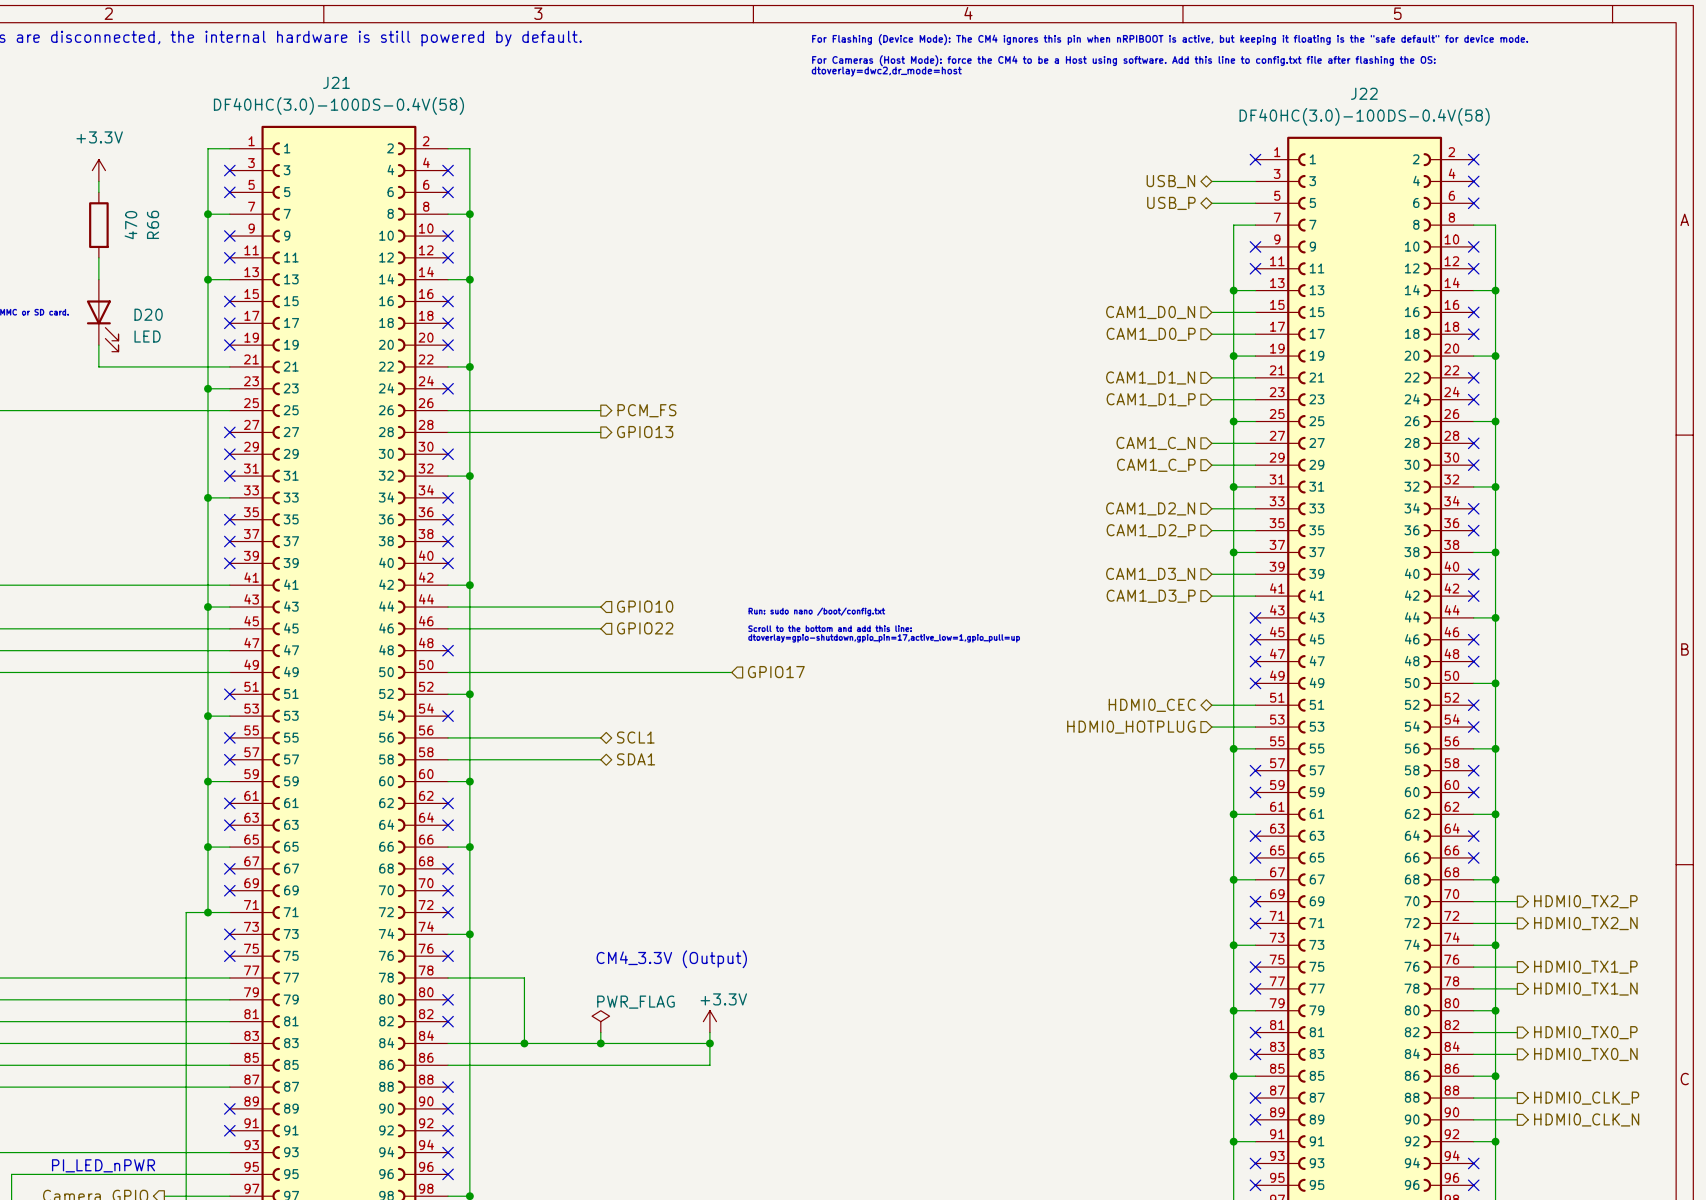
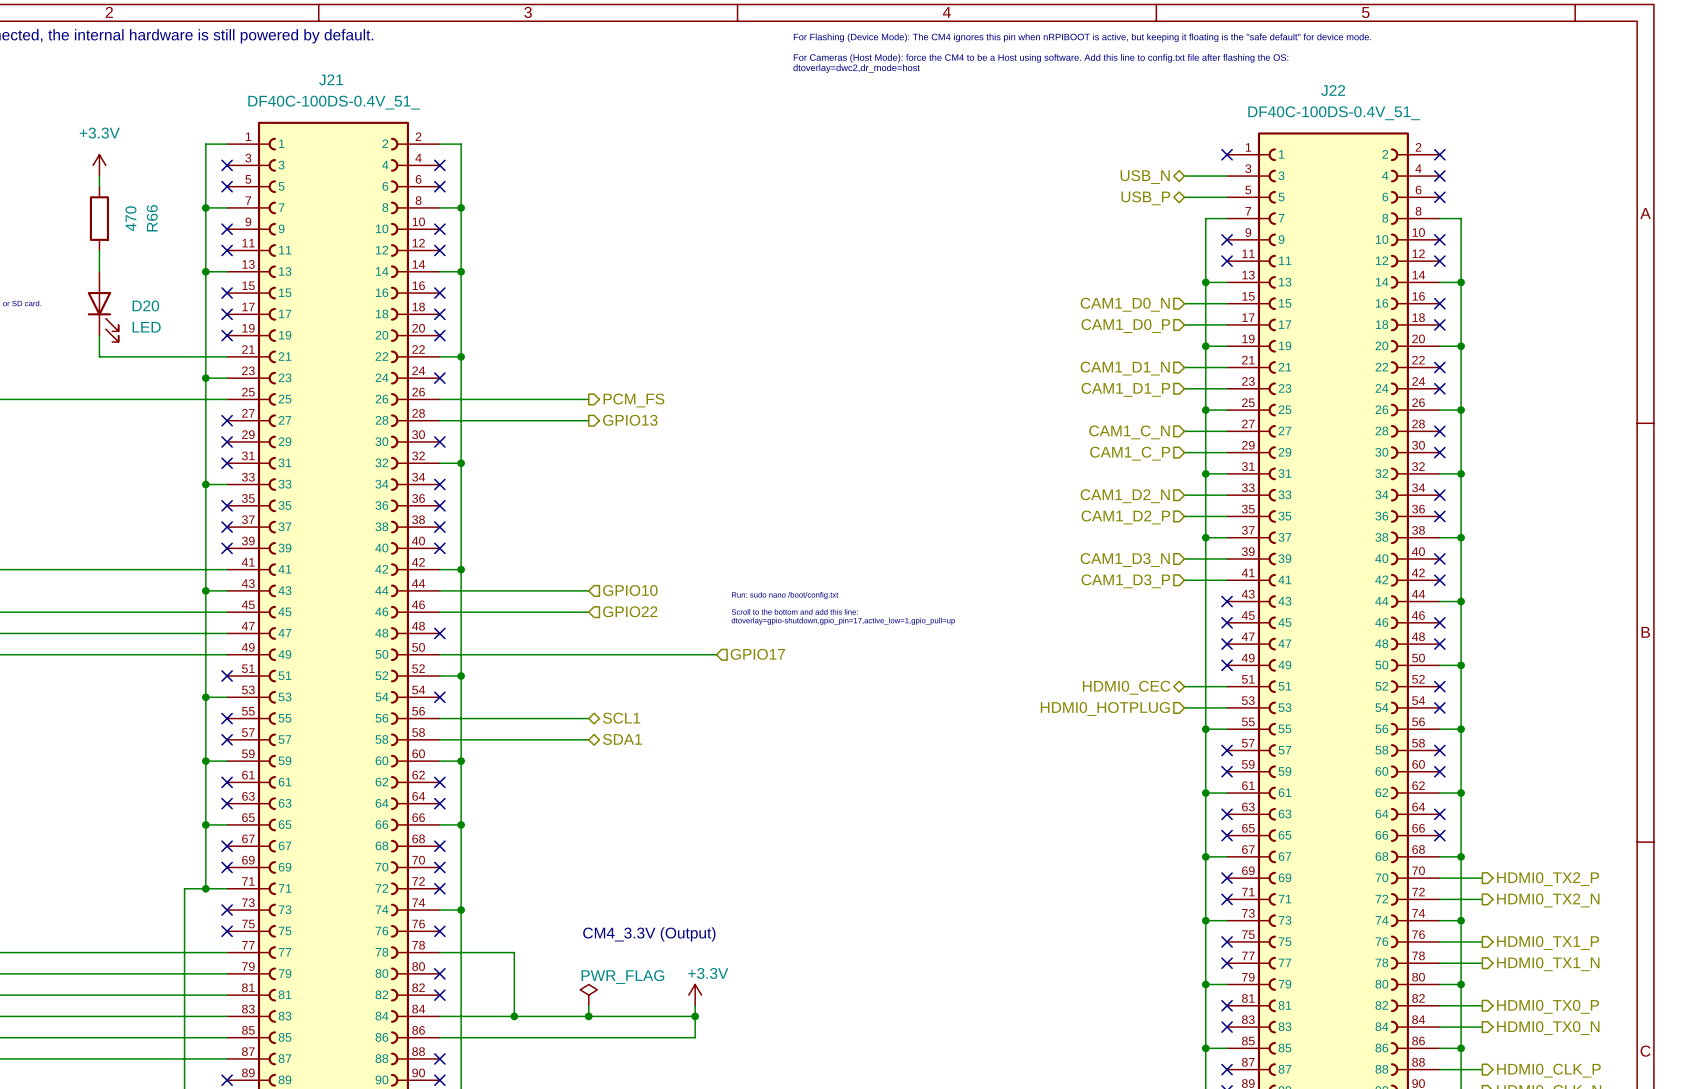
J21 value: DF40HC(3.0)-100DS-0.4V(58) (338, 105) -> DF40C-100DS-0.4V_51_ (334, 102)
J22 value: DF40HC(3.0)-100DS-0.4V(58) (1364, 116) -> DF40C-100DS-0.4V_51_ (1334, 113)

